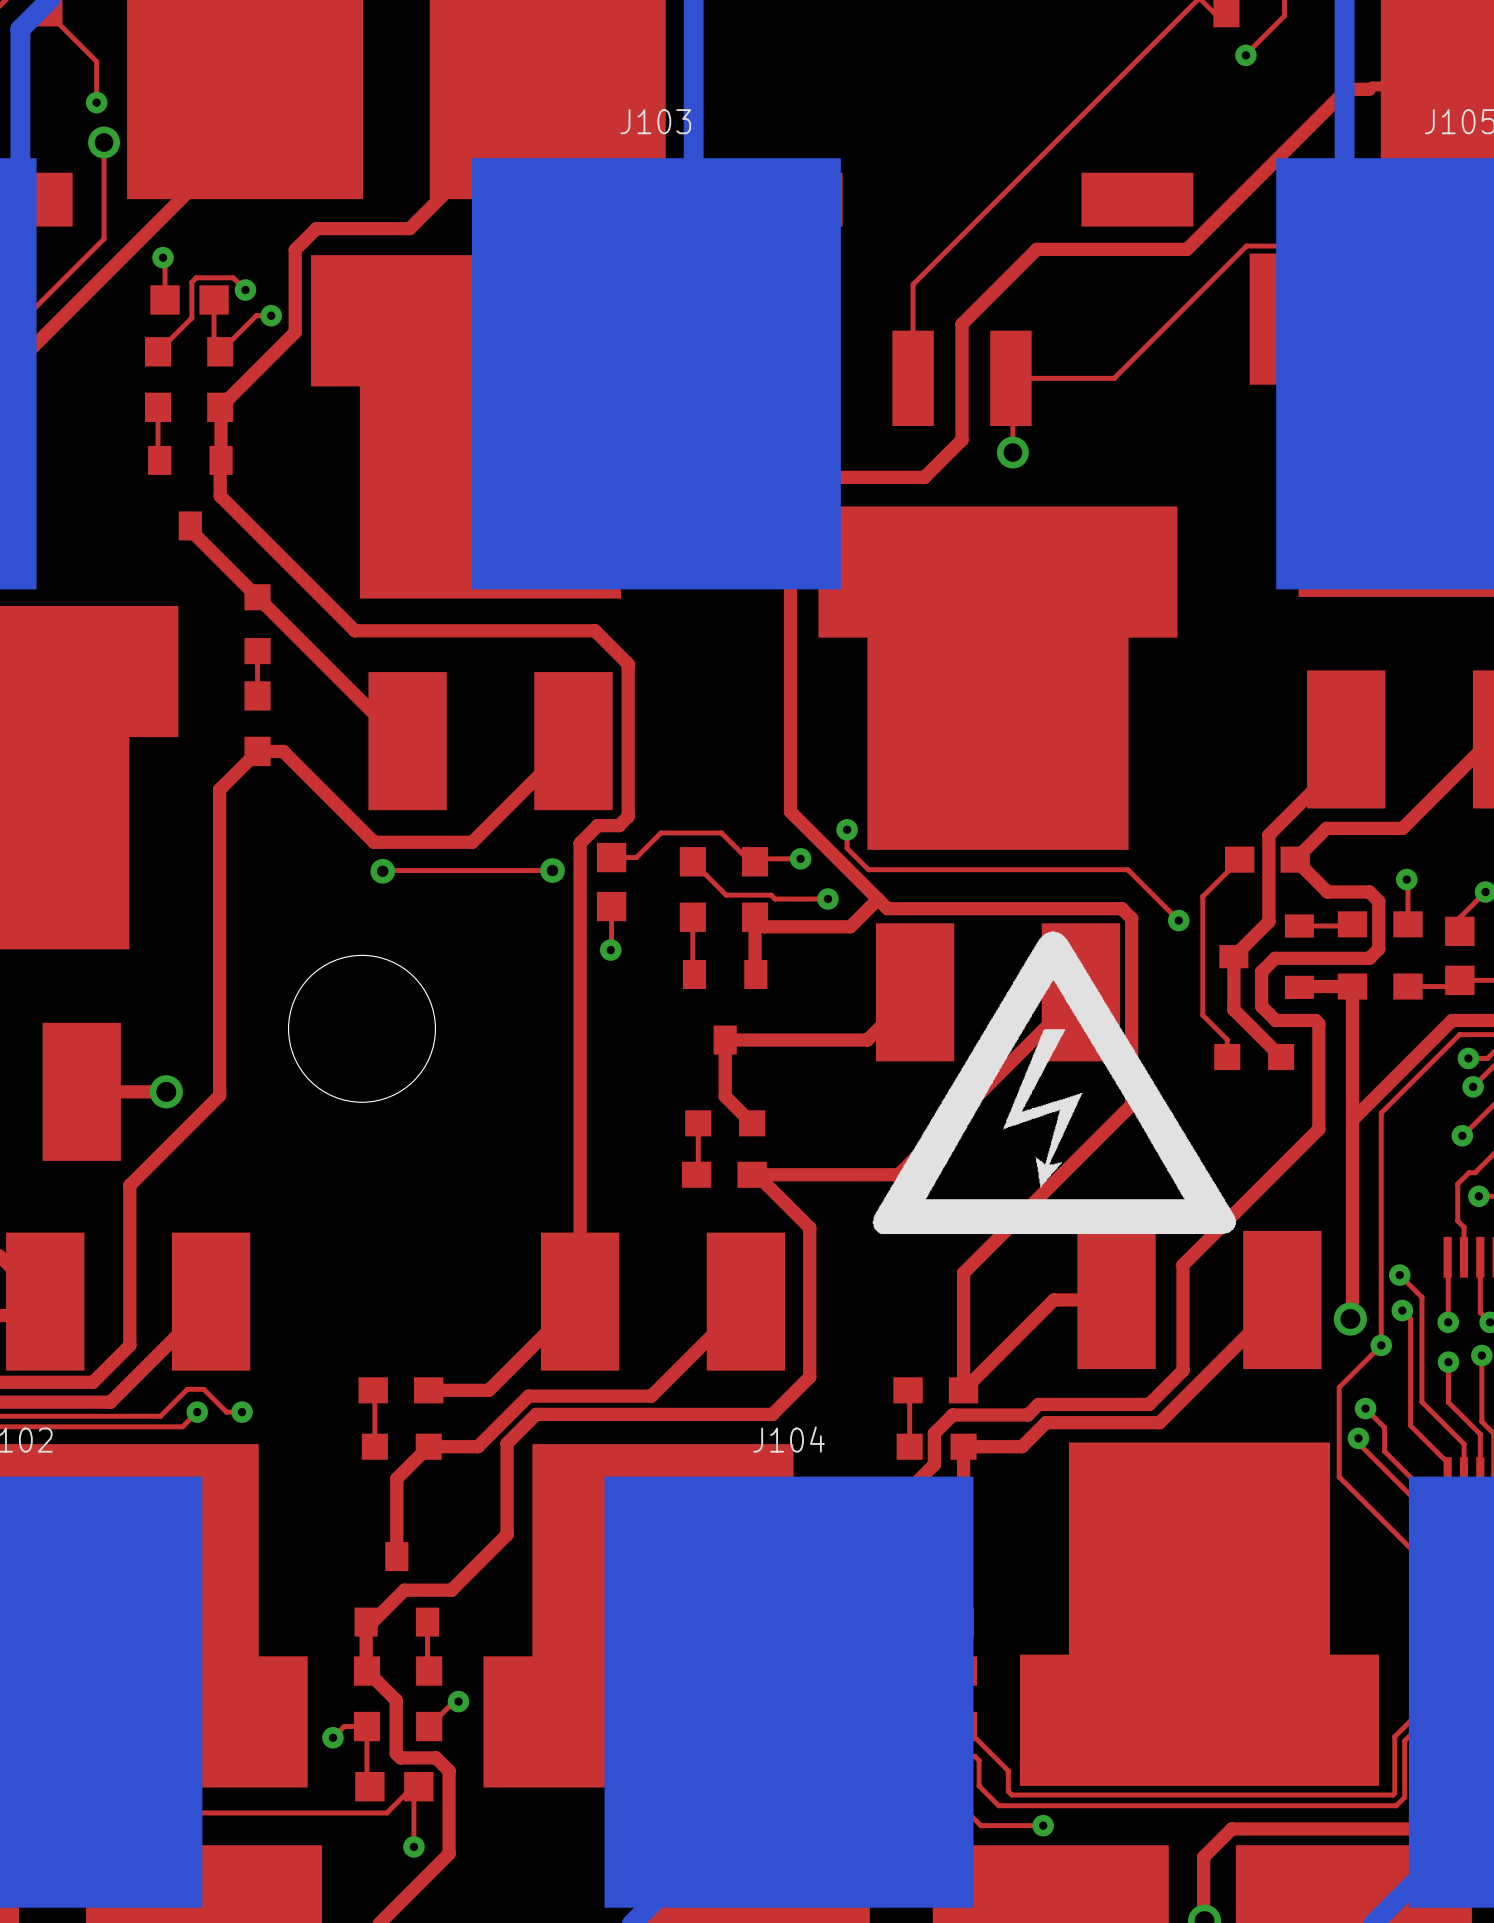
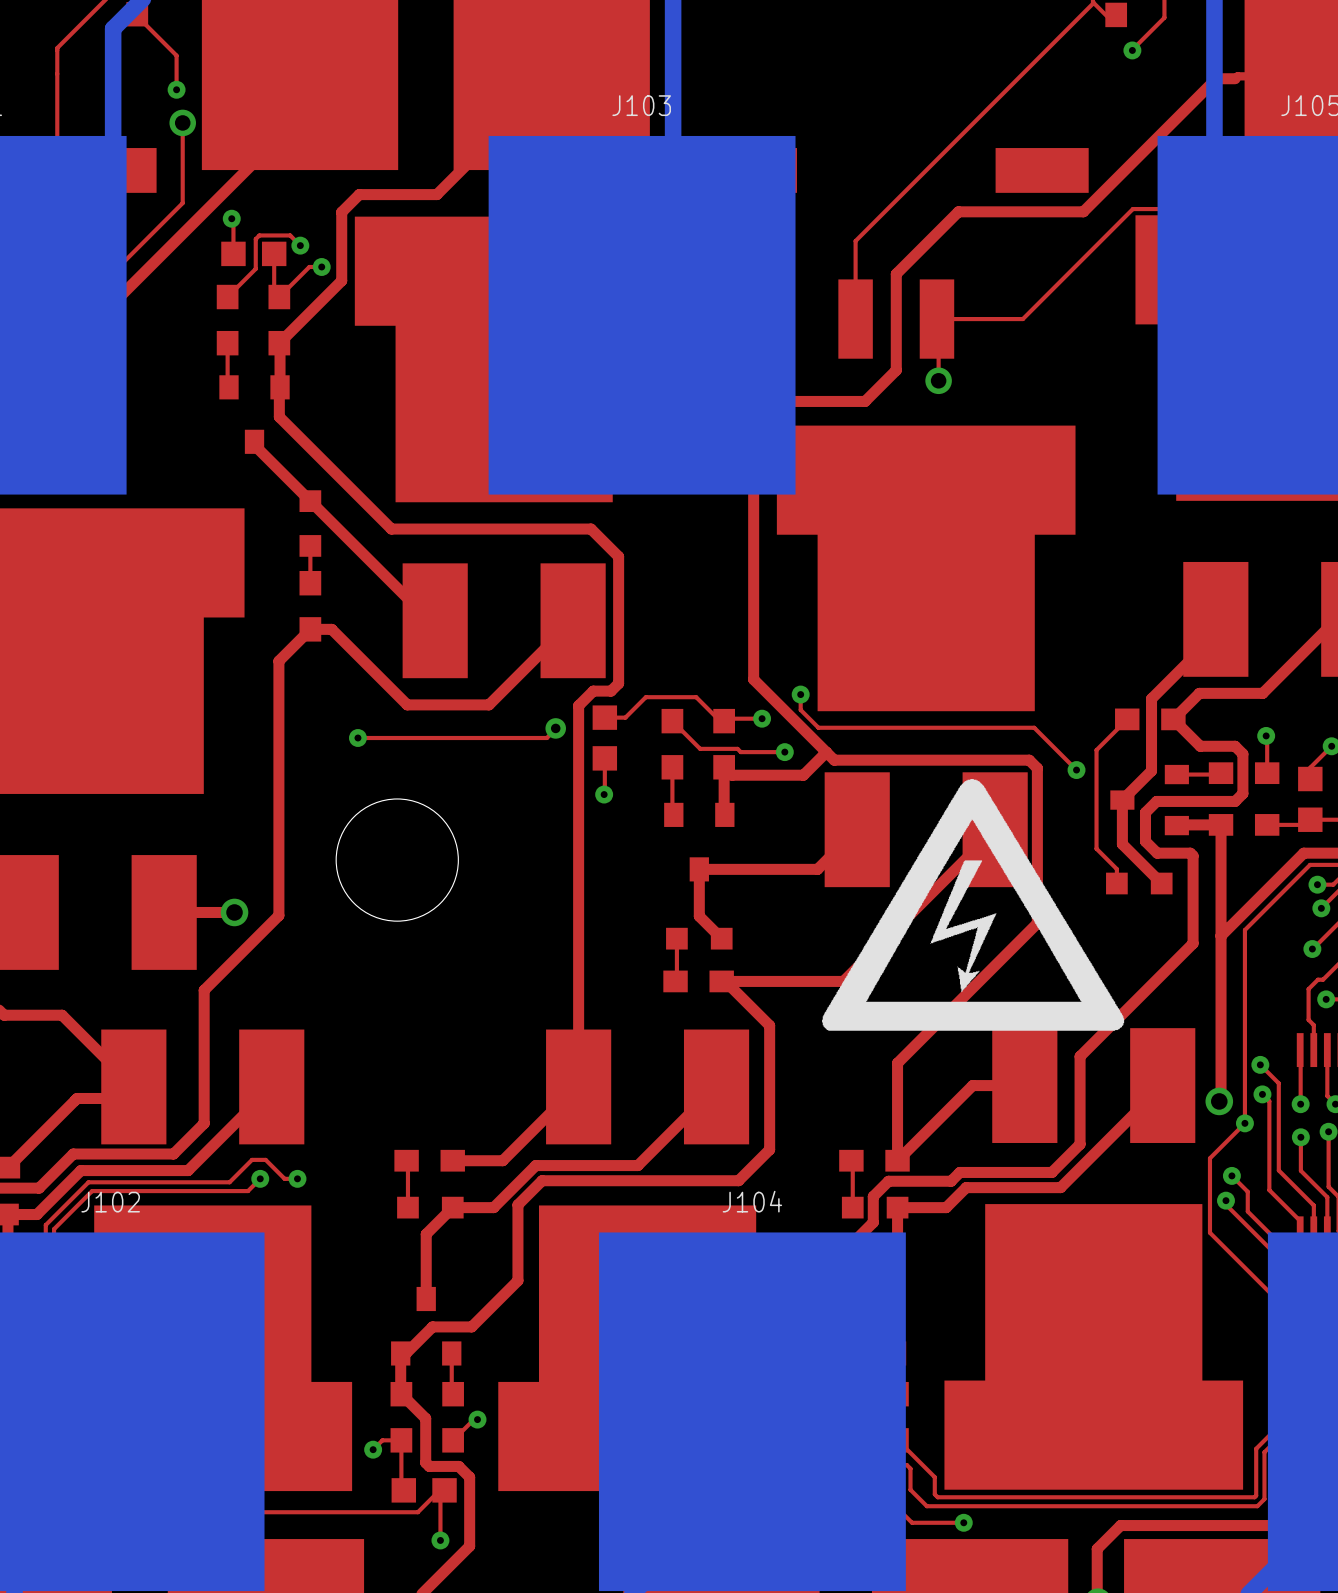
top track: (552, 870) (382, 871) -> none
via: (382, 871) -> none
top track: none -> (555, 729) (546, 738) (357, 738)
via: none -> (357, 738)

